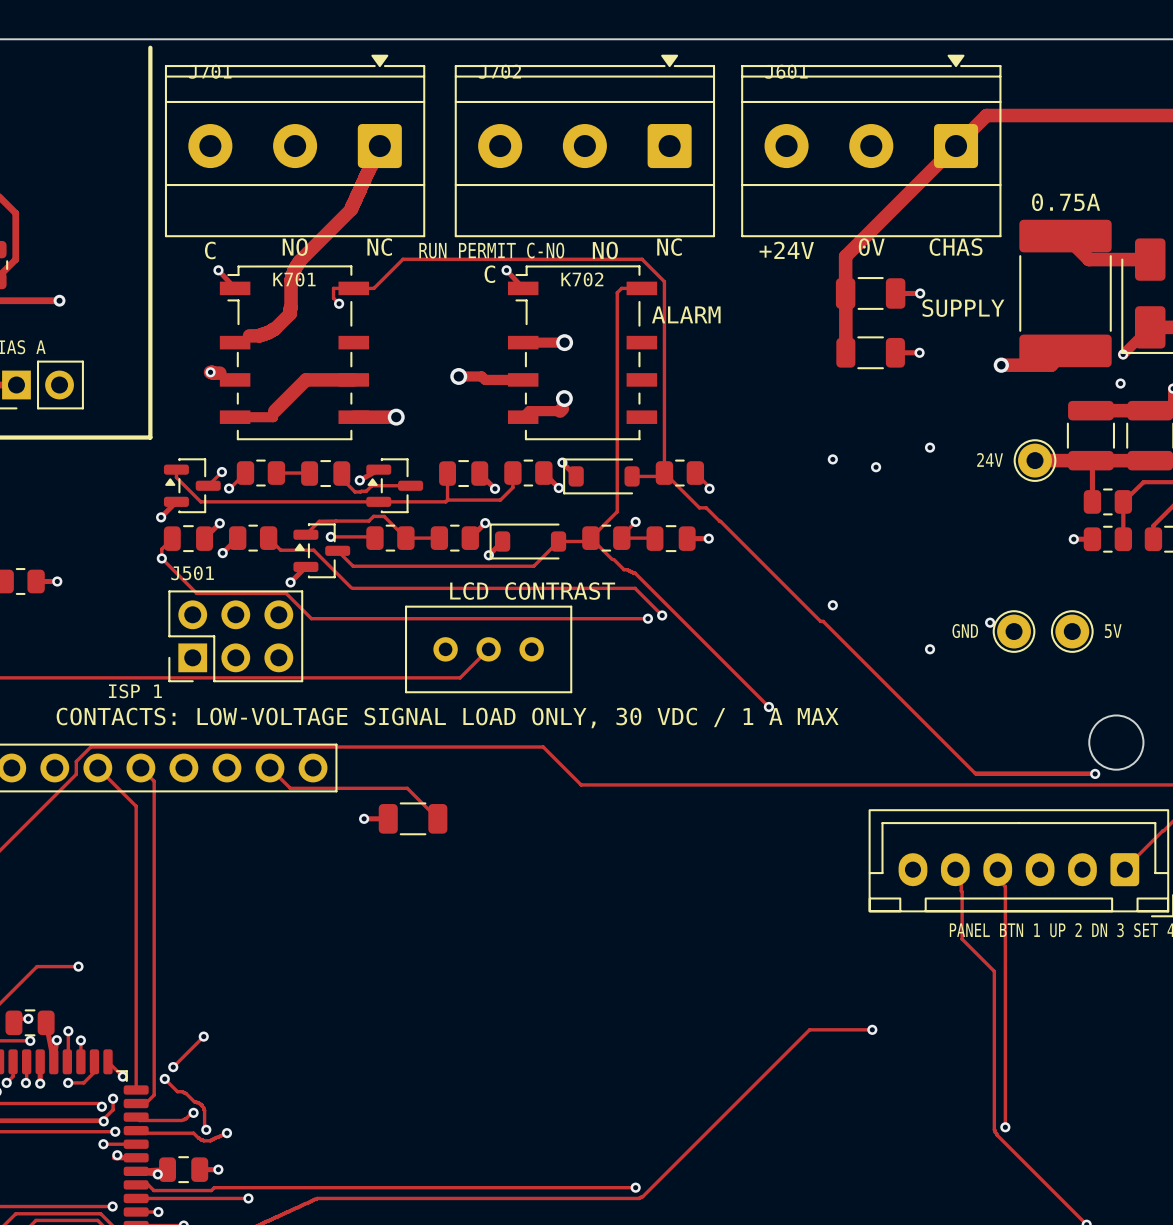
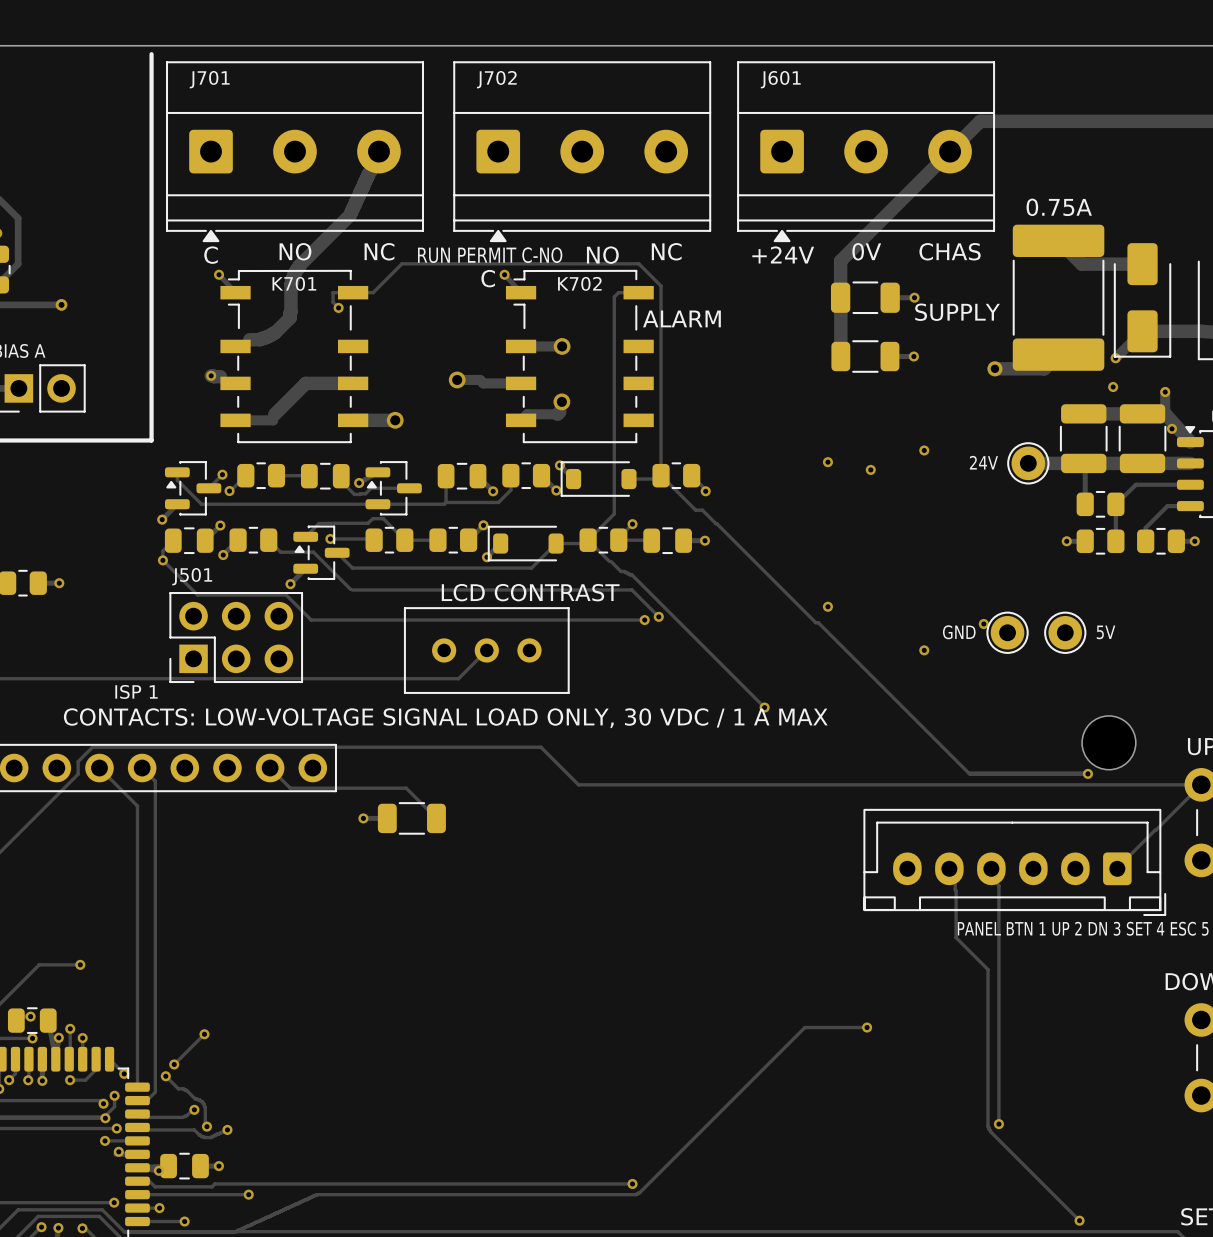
part rotation: 0° (295, 145) -> 180° (295, 151)
part rotation: 0° (584, 145) -> 180° (582, 151)
part rotation: 0° (871, 145) -> 180° (866, 151)

